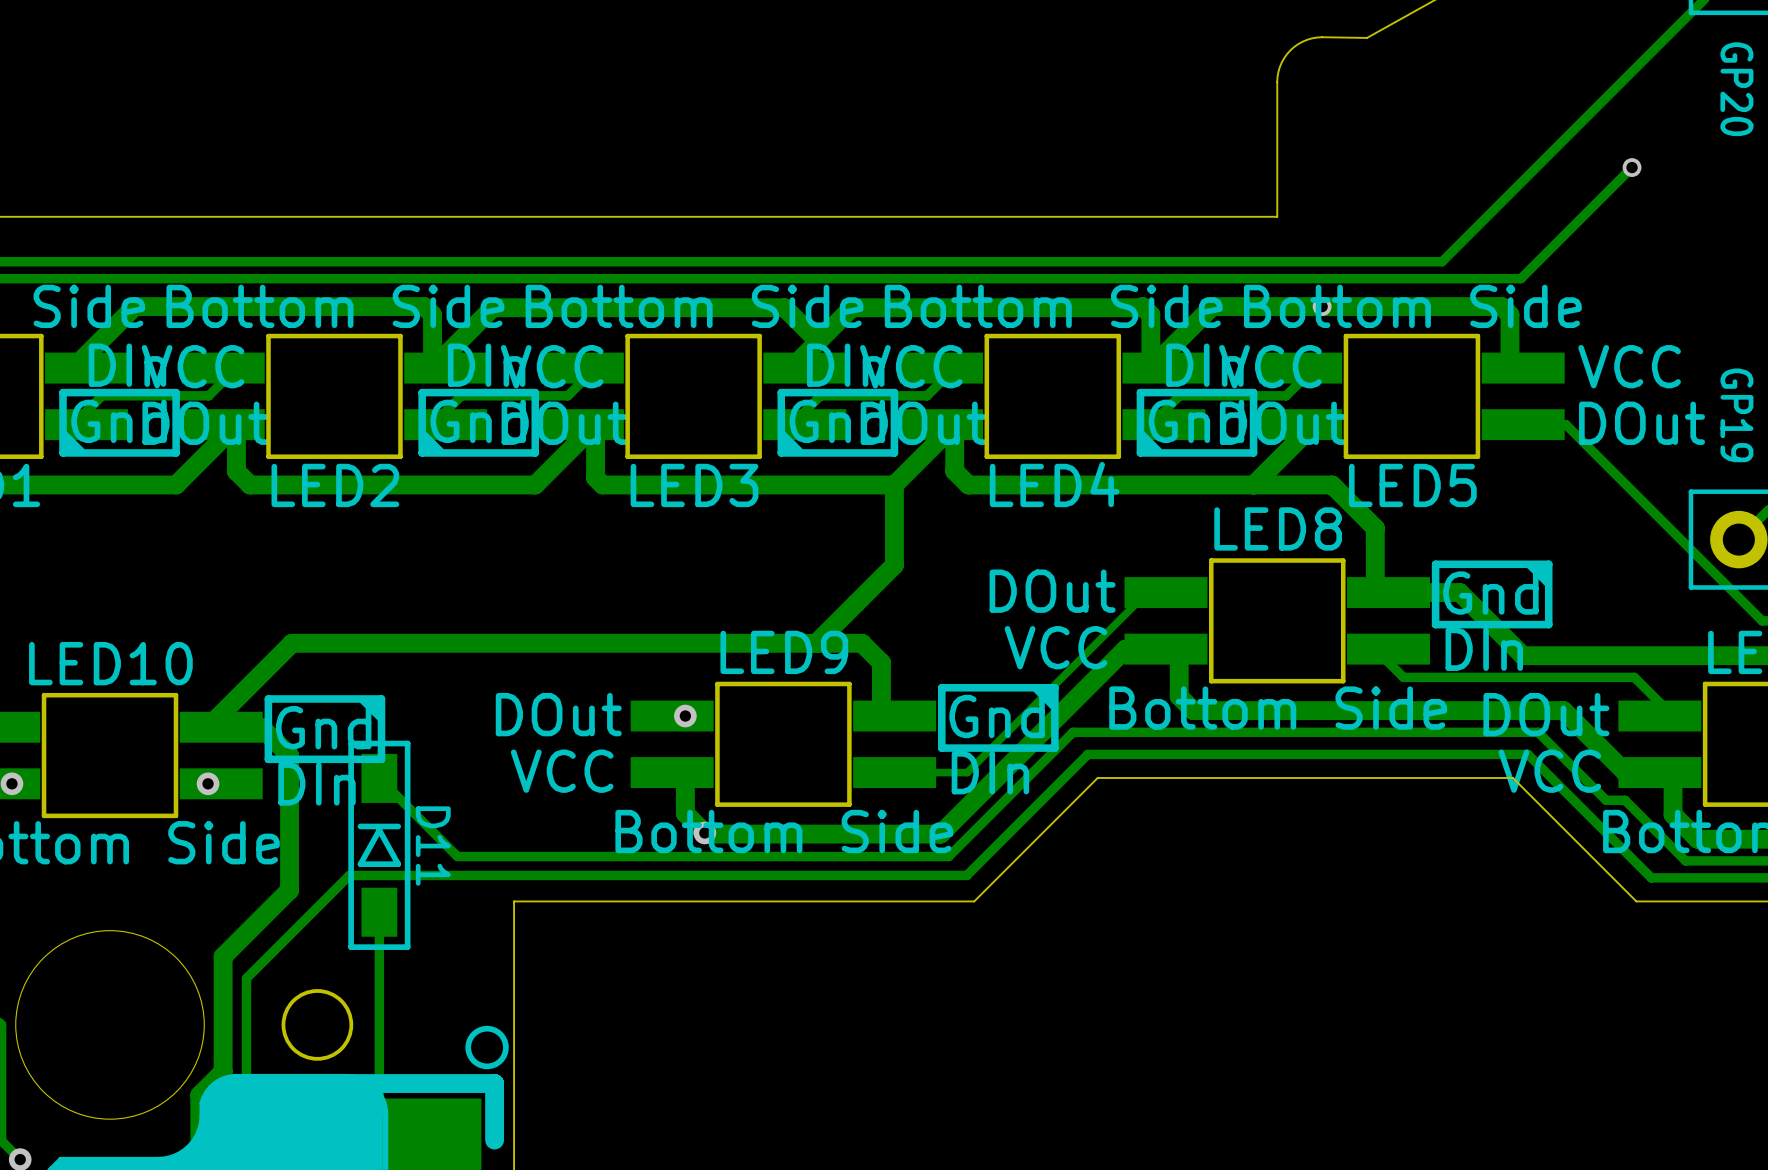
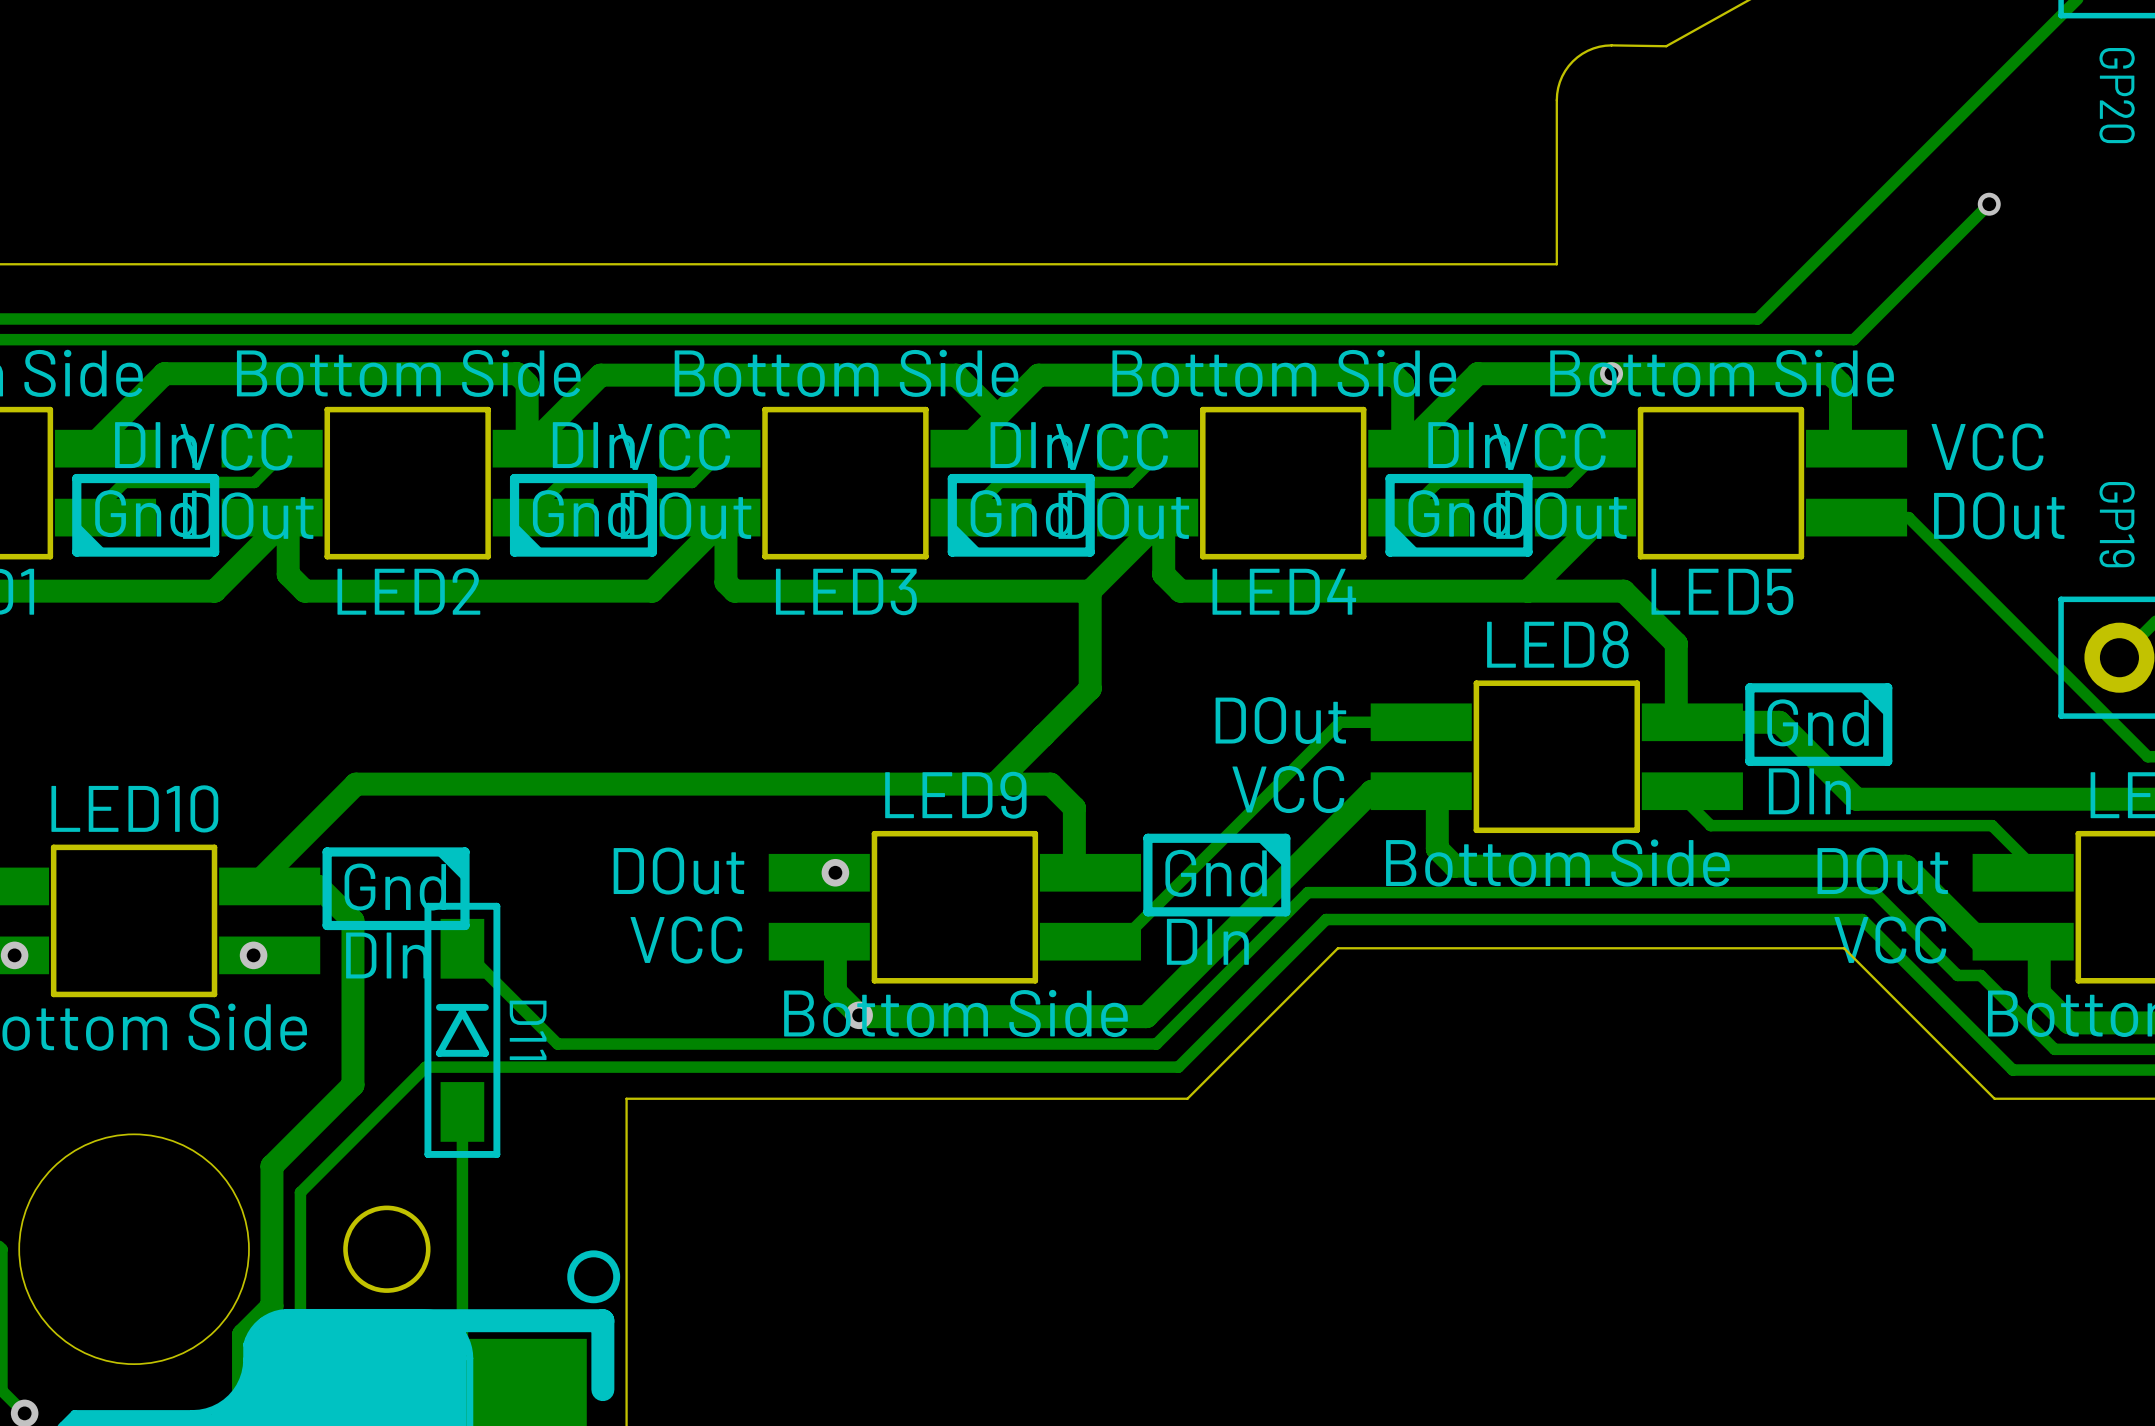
track: (1179, 592) (1147, 592) (967, 772) (919, 772) -> (1390, 722) (1340, 722) (1120, 941)

